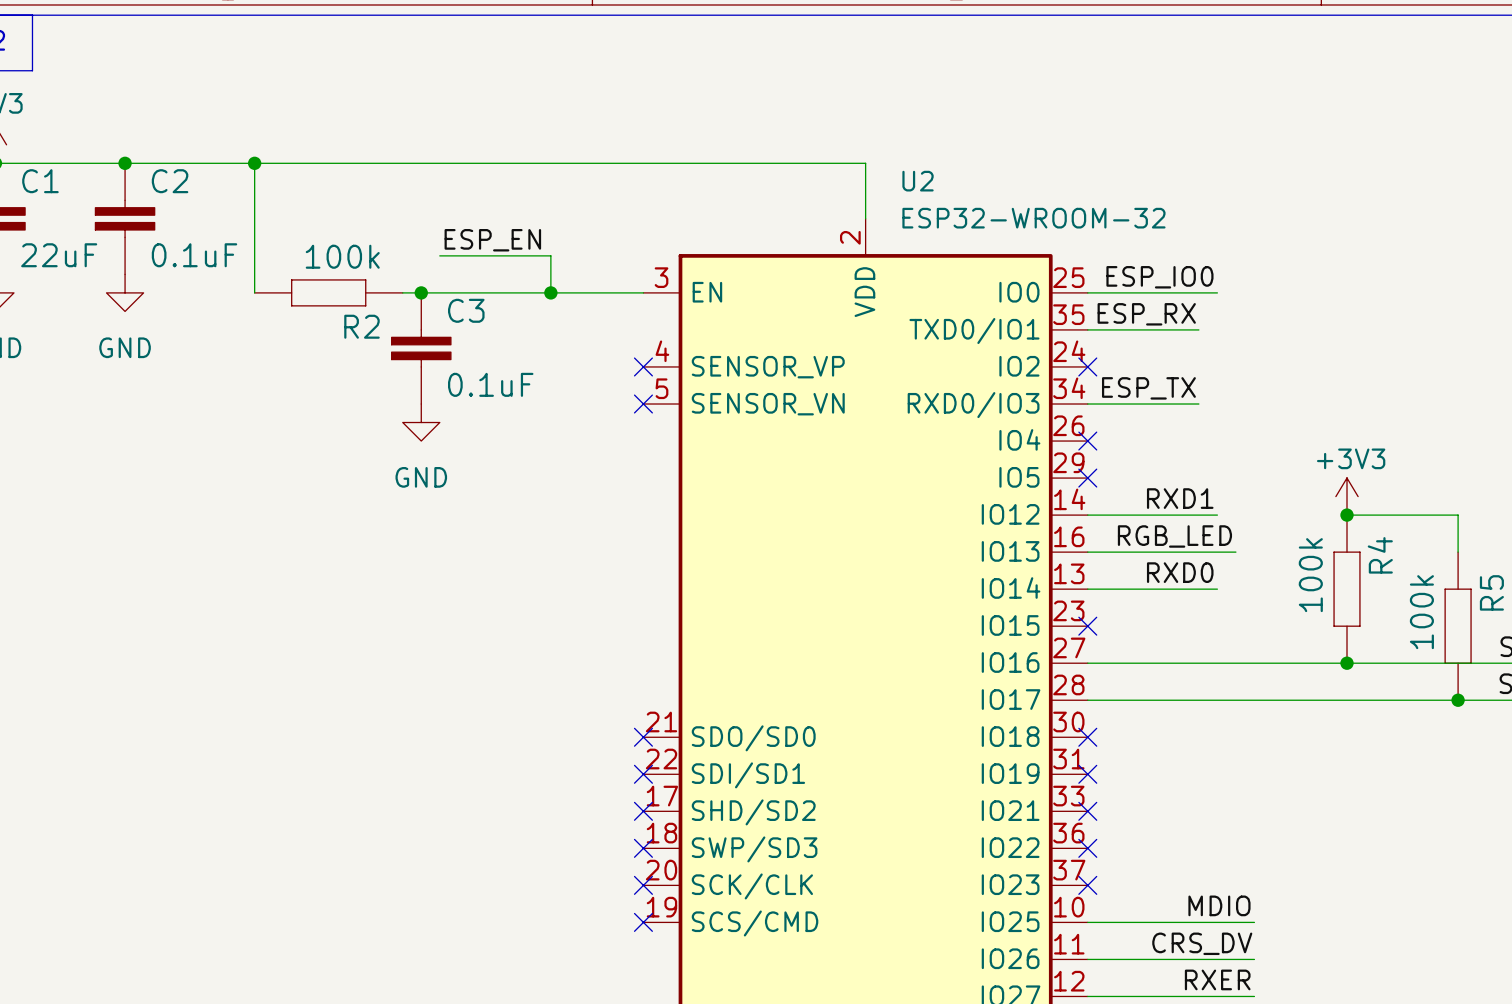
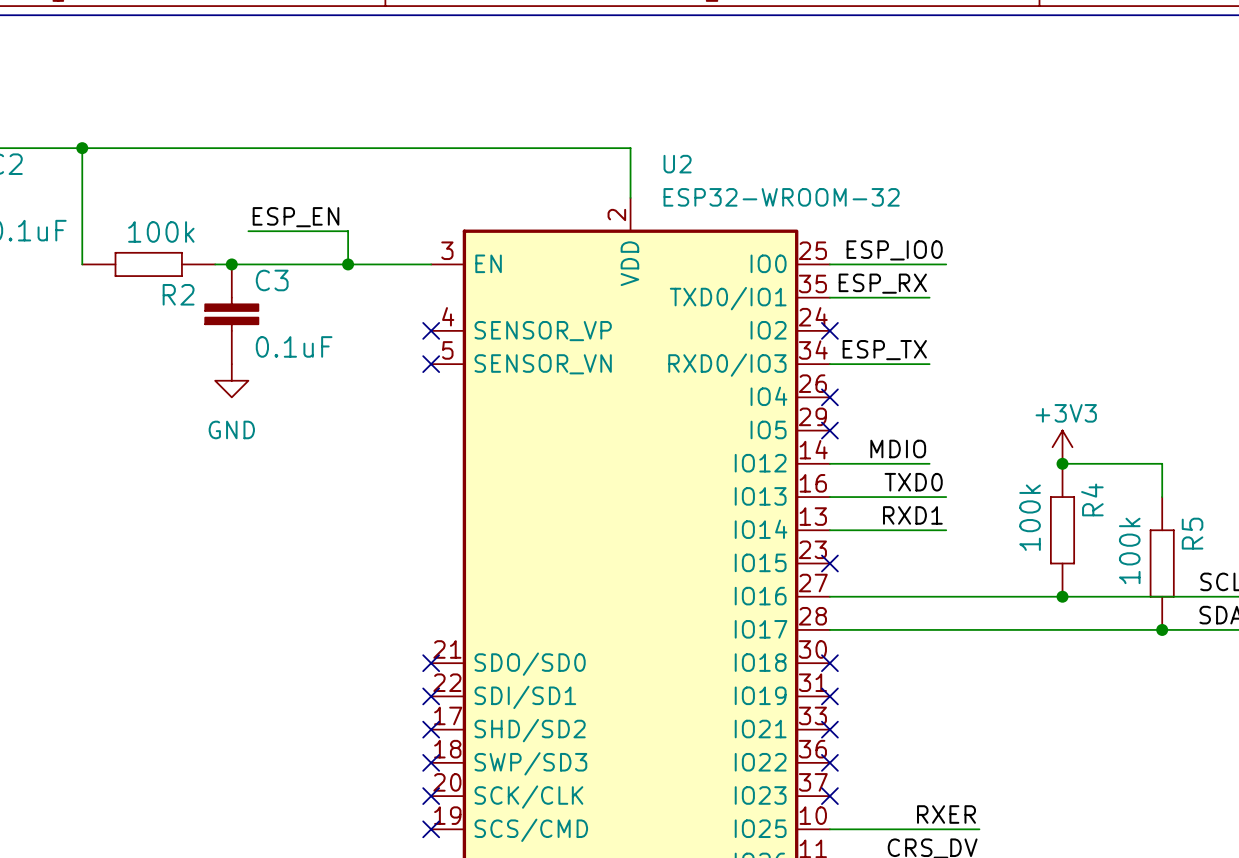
label: none -> MDIO (898, 448)
label: RXD1 (1180, 498) -> none
wire: (1198, 515) (1217, 515) -> none
label: none -> TXD0 (913, 482)
label: RGB_LED (1174, 536) -> none
wire: (1217, 552) (1235, 552) -> none
label: RXD0 (1180, 572) -> RXD1 (912, 515)
label: MDIO (1219, 905) -> RXER (946, 814)

